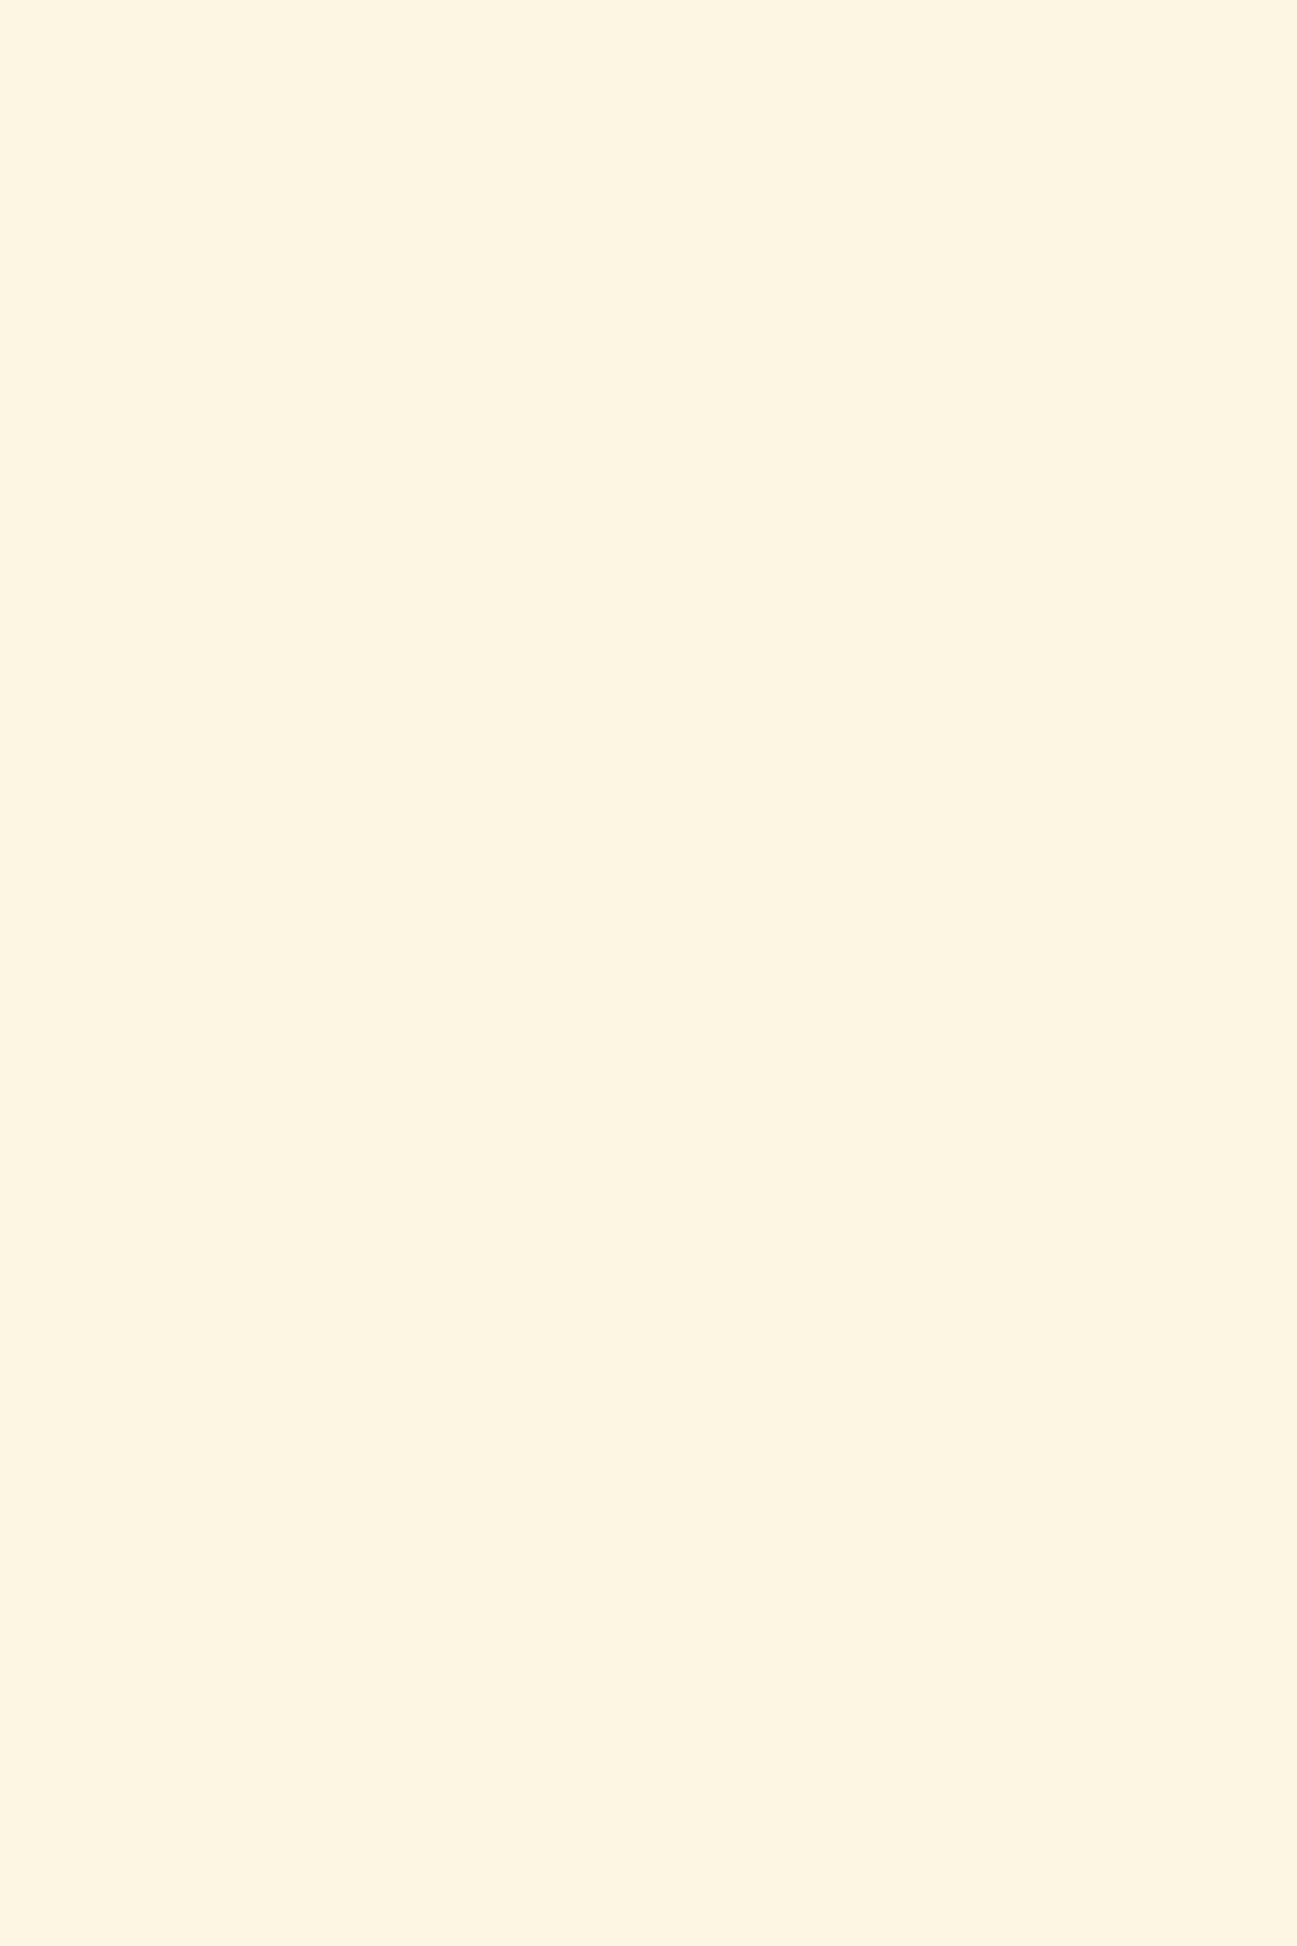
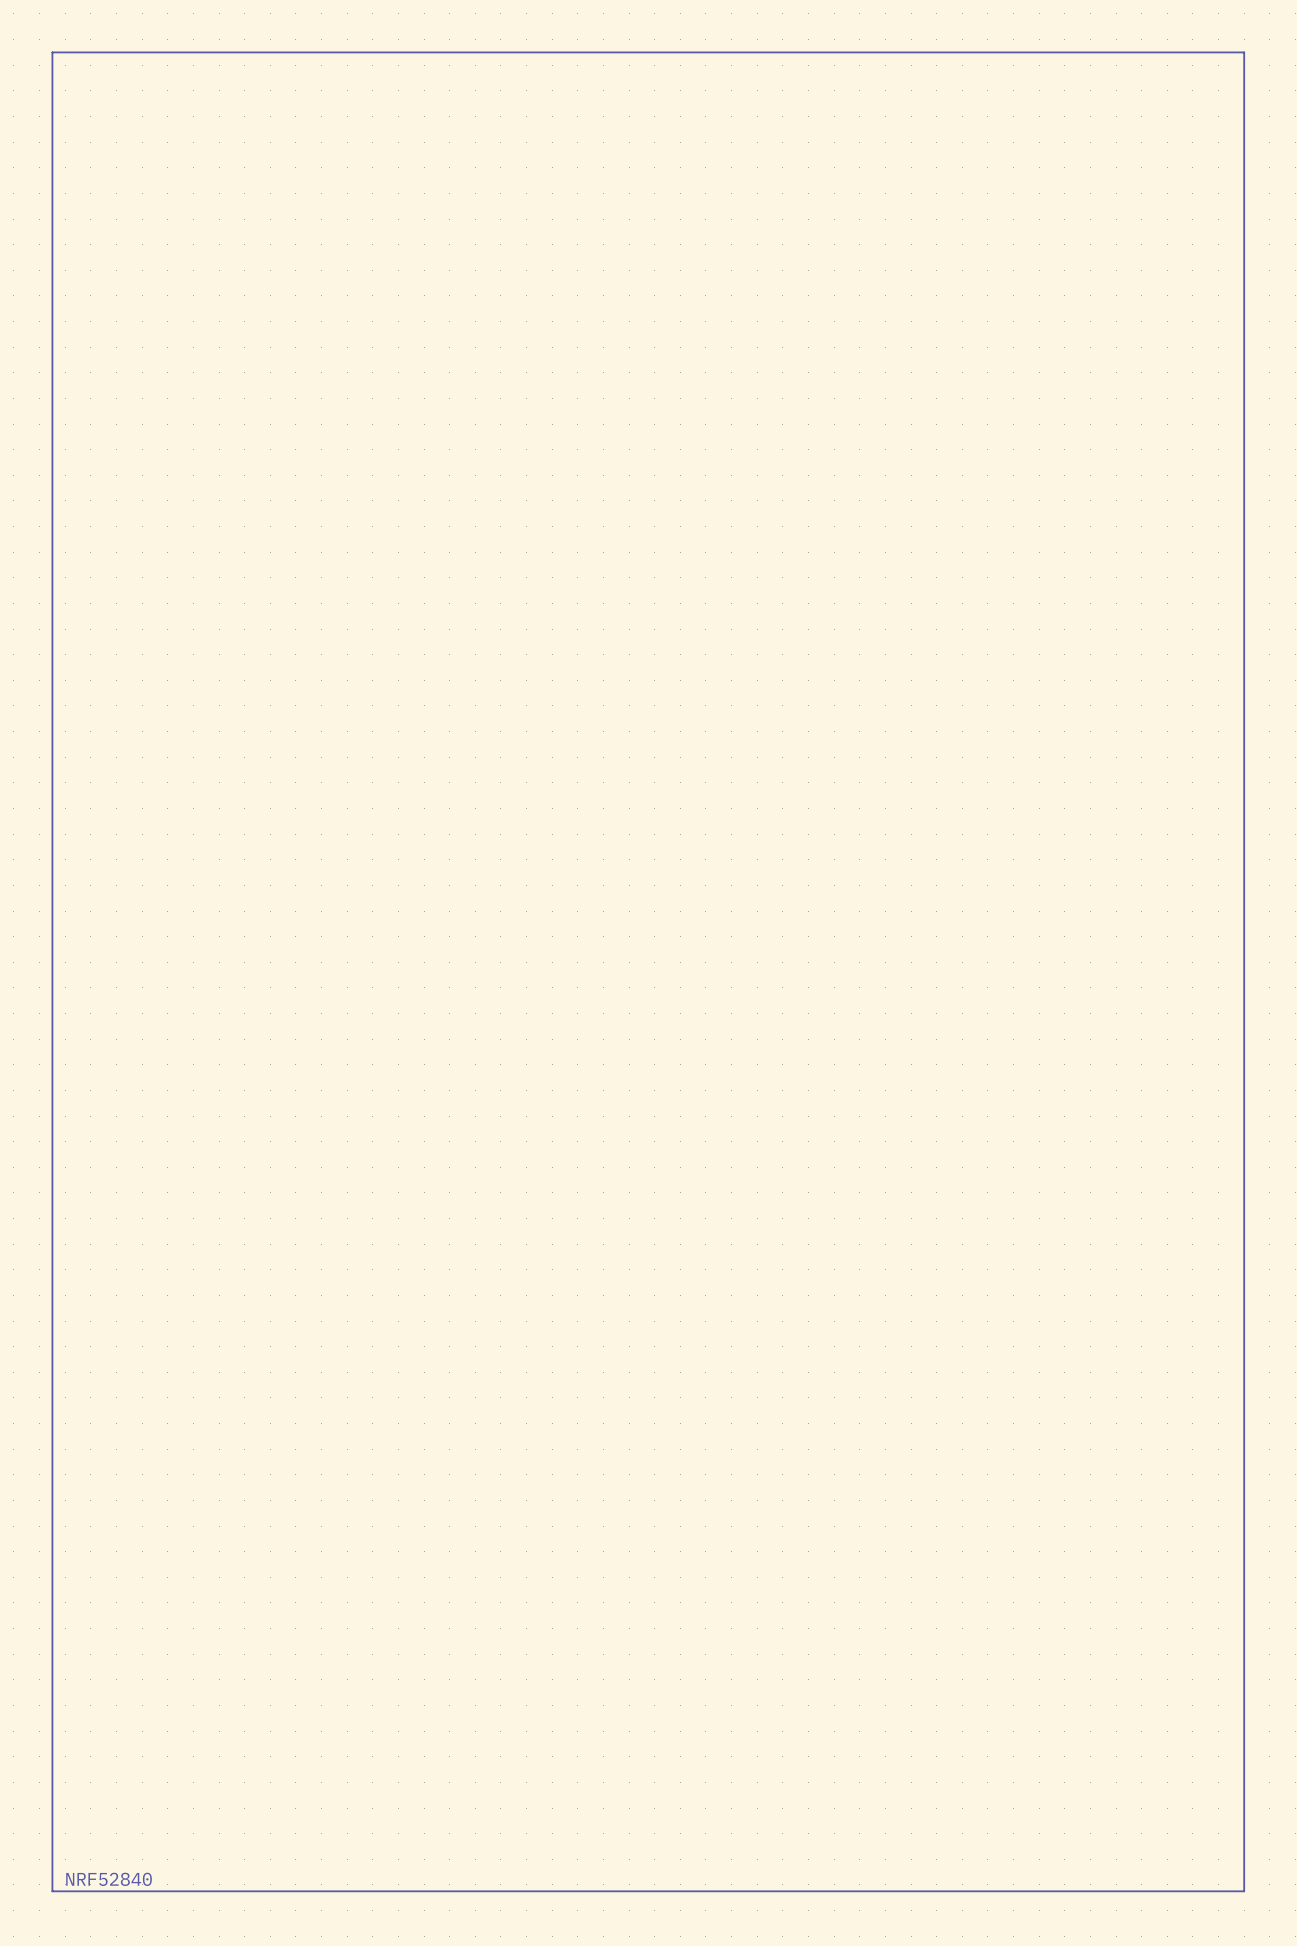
line: none -> (52, 52) (1244, 52) (1244, 1891) (52, 1891) (52, 52)
text: none -> NRF52840 (109, 1879)

